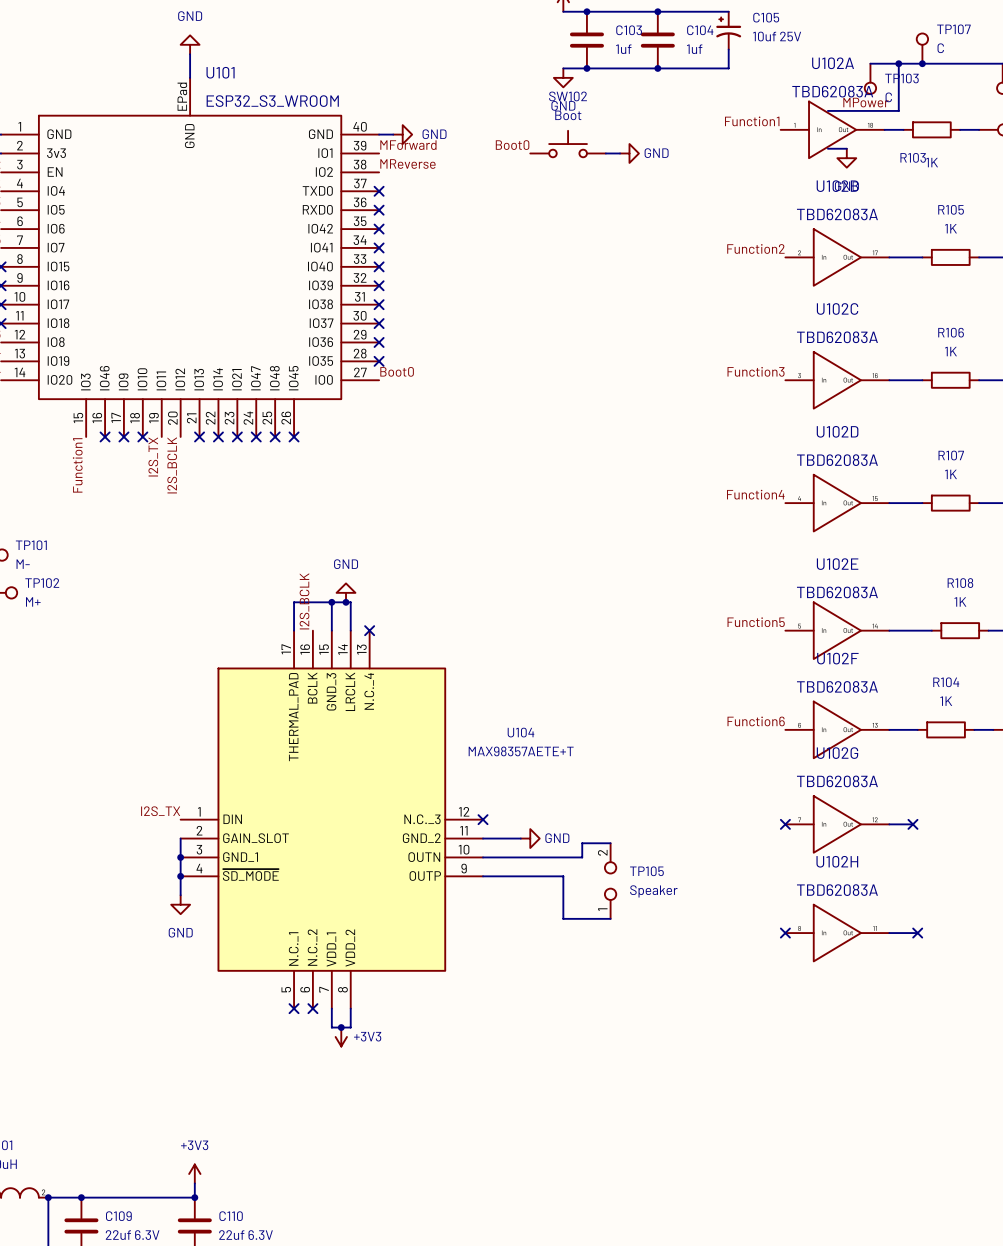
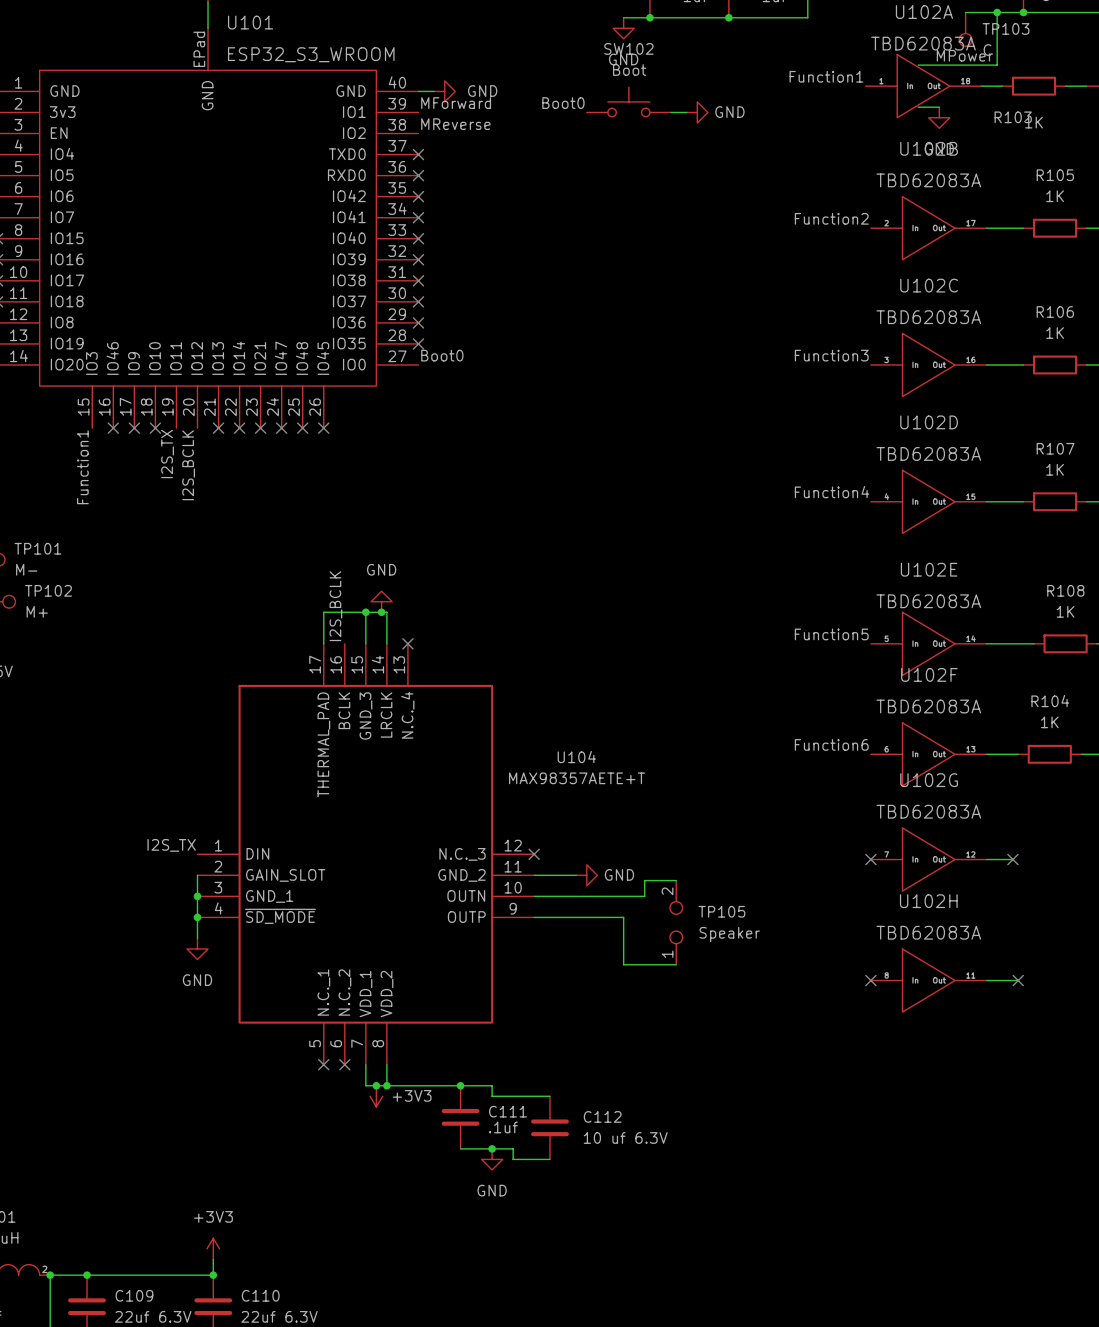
wire: none -> (386, 1085) (492, 1085) (492, 1096) (549, 1096)
junction: none -> (386, 1085)
junction: none -> (460, 1085)
C111: none -> .1uf (460, 1117)
C112: none -> 10 uf 6.3V (549, 1127)
wire: none -> (460, 1148) (513, 1148) (513, 1159) (549, 1159)
junction: none -> (492, 1148)
power symbol: none -> GND (492, 1159)

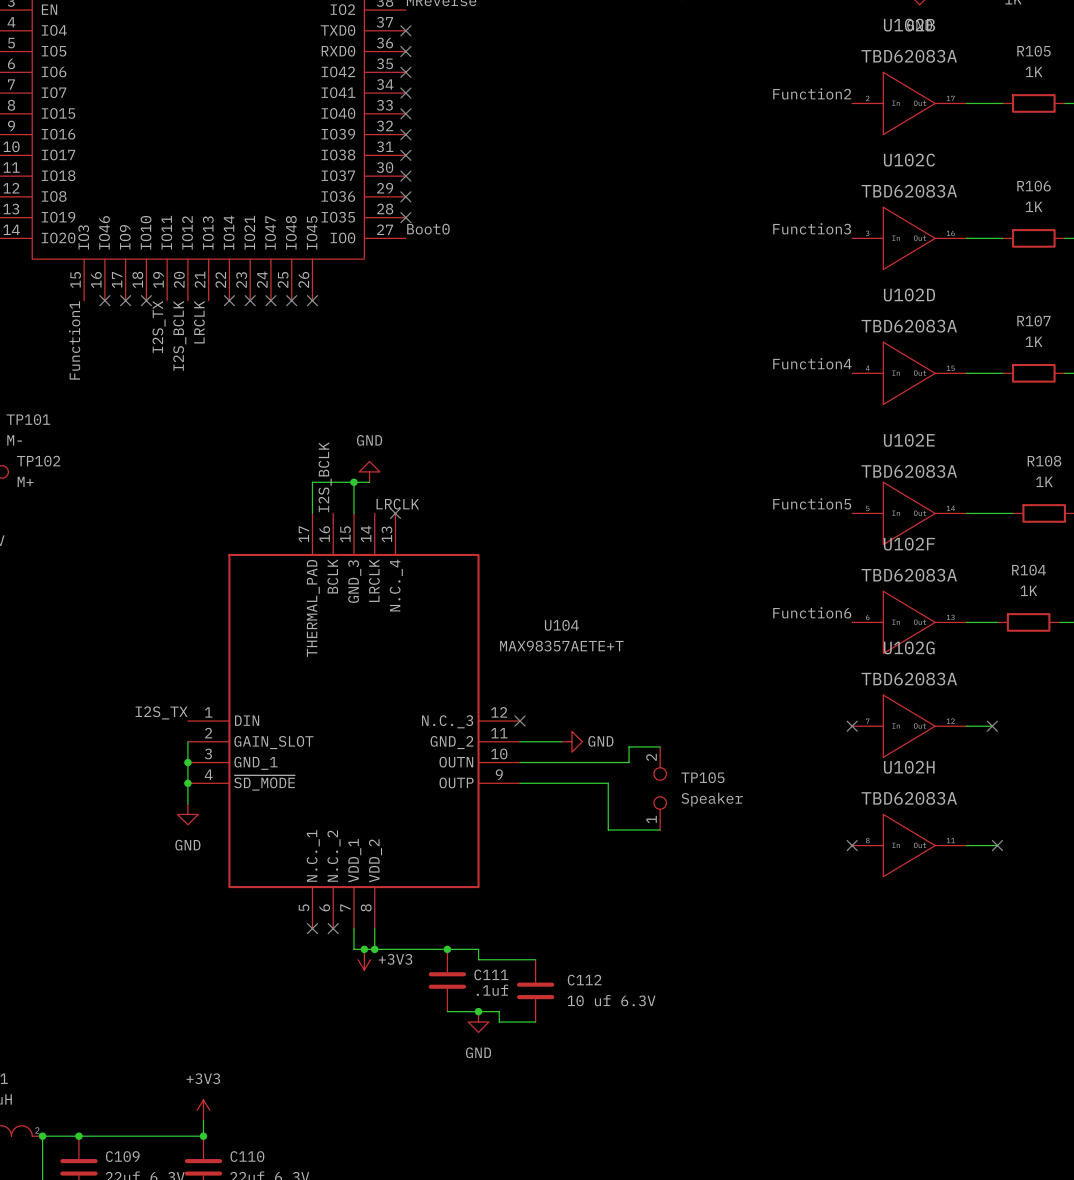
no-connect mark: (218, 428) -> none
label: none -> LRCLK (199, 322)
wire: (381, 612) (386, 612) (386, 643) -> none
junction: (381, 612) -> none
label: none -> LRCLK (397, 504)

